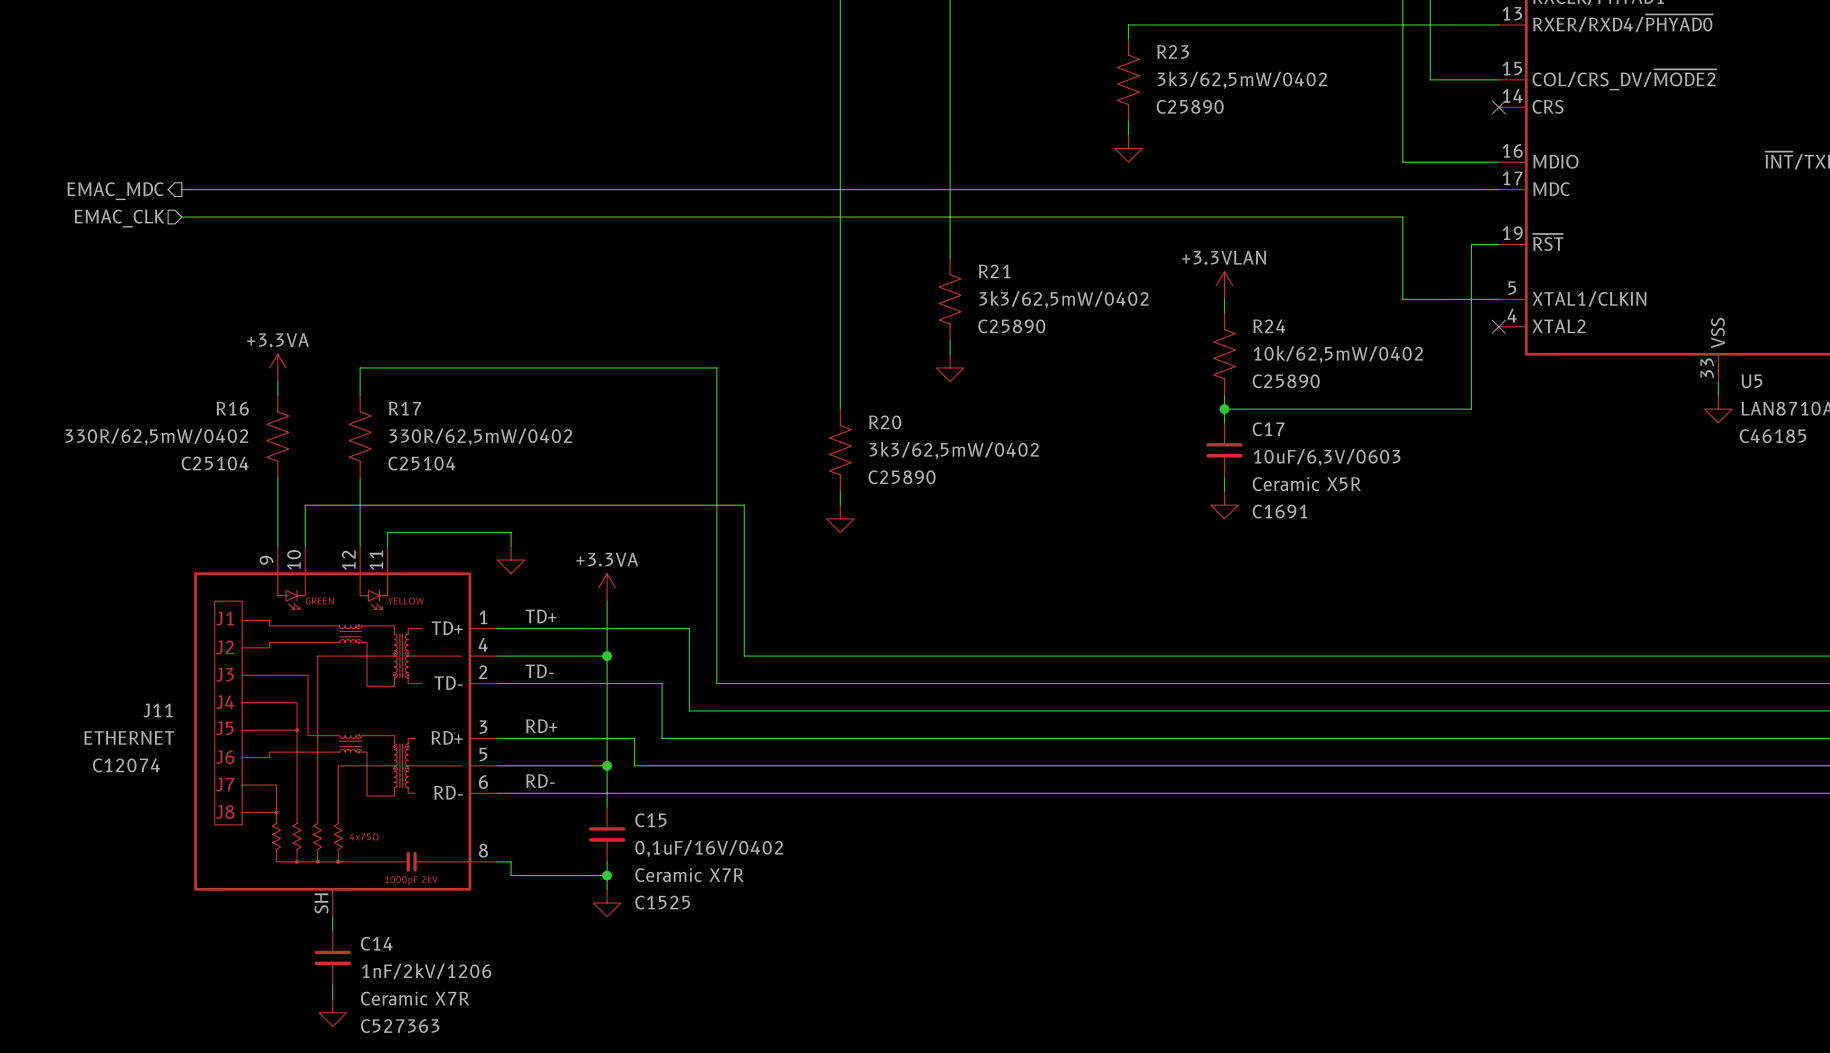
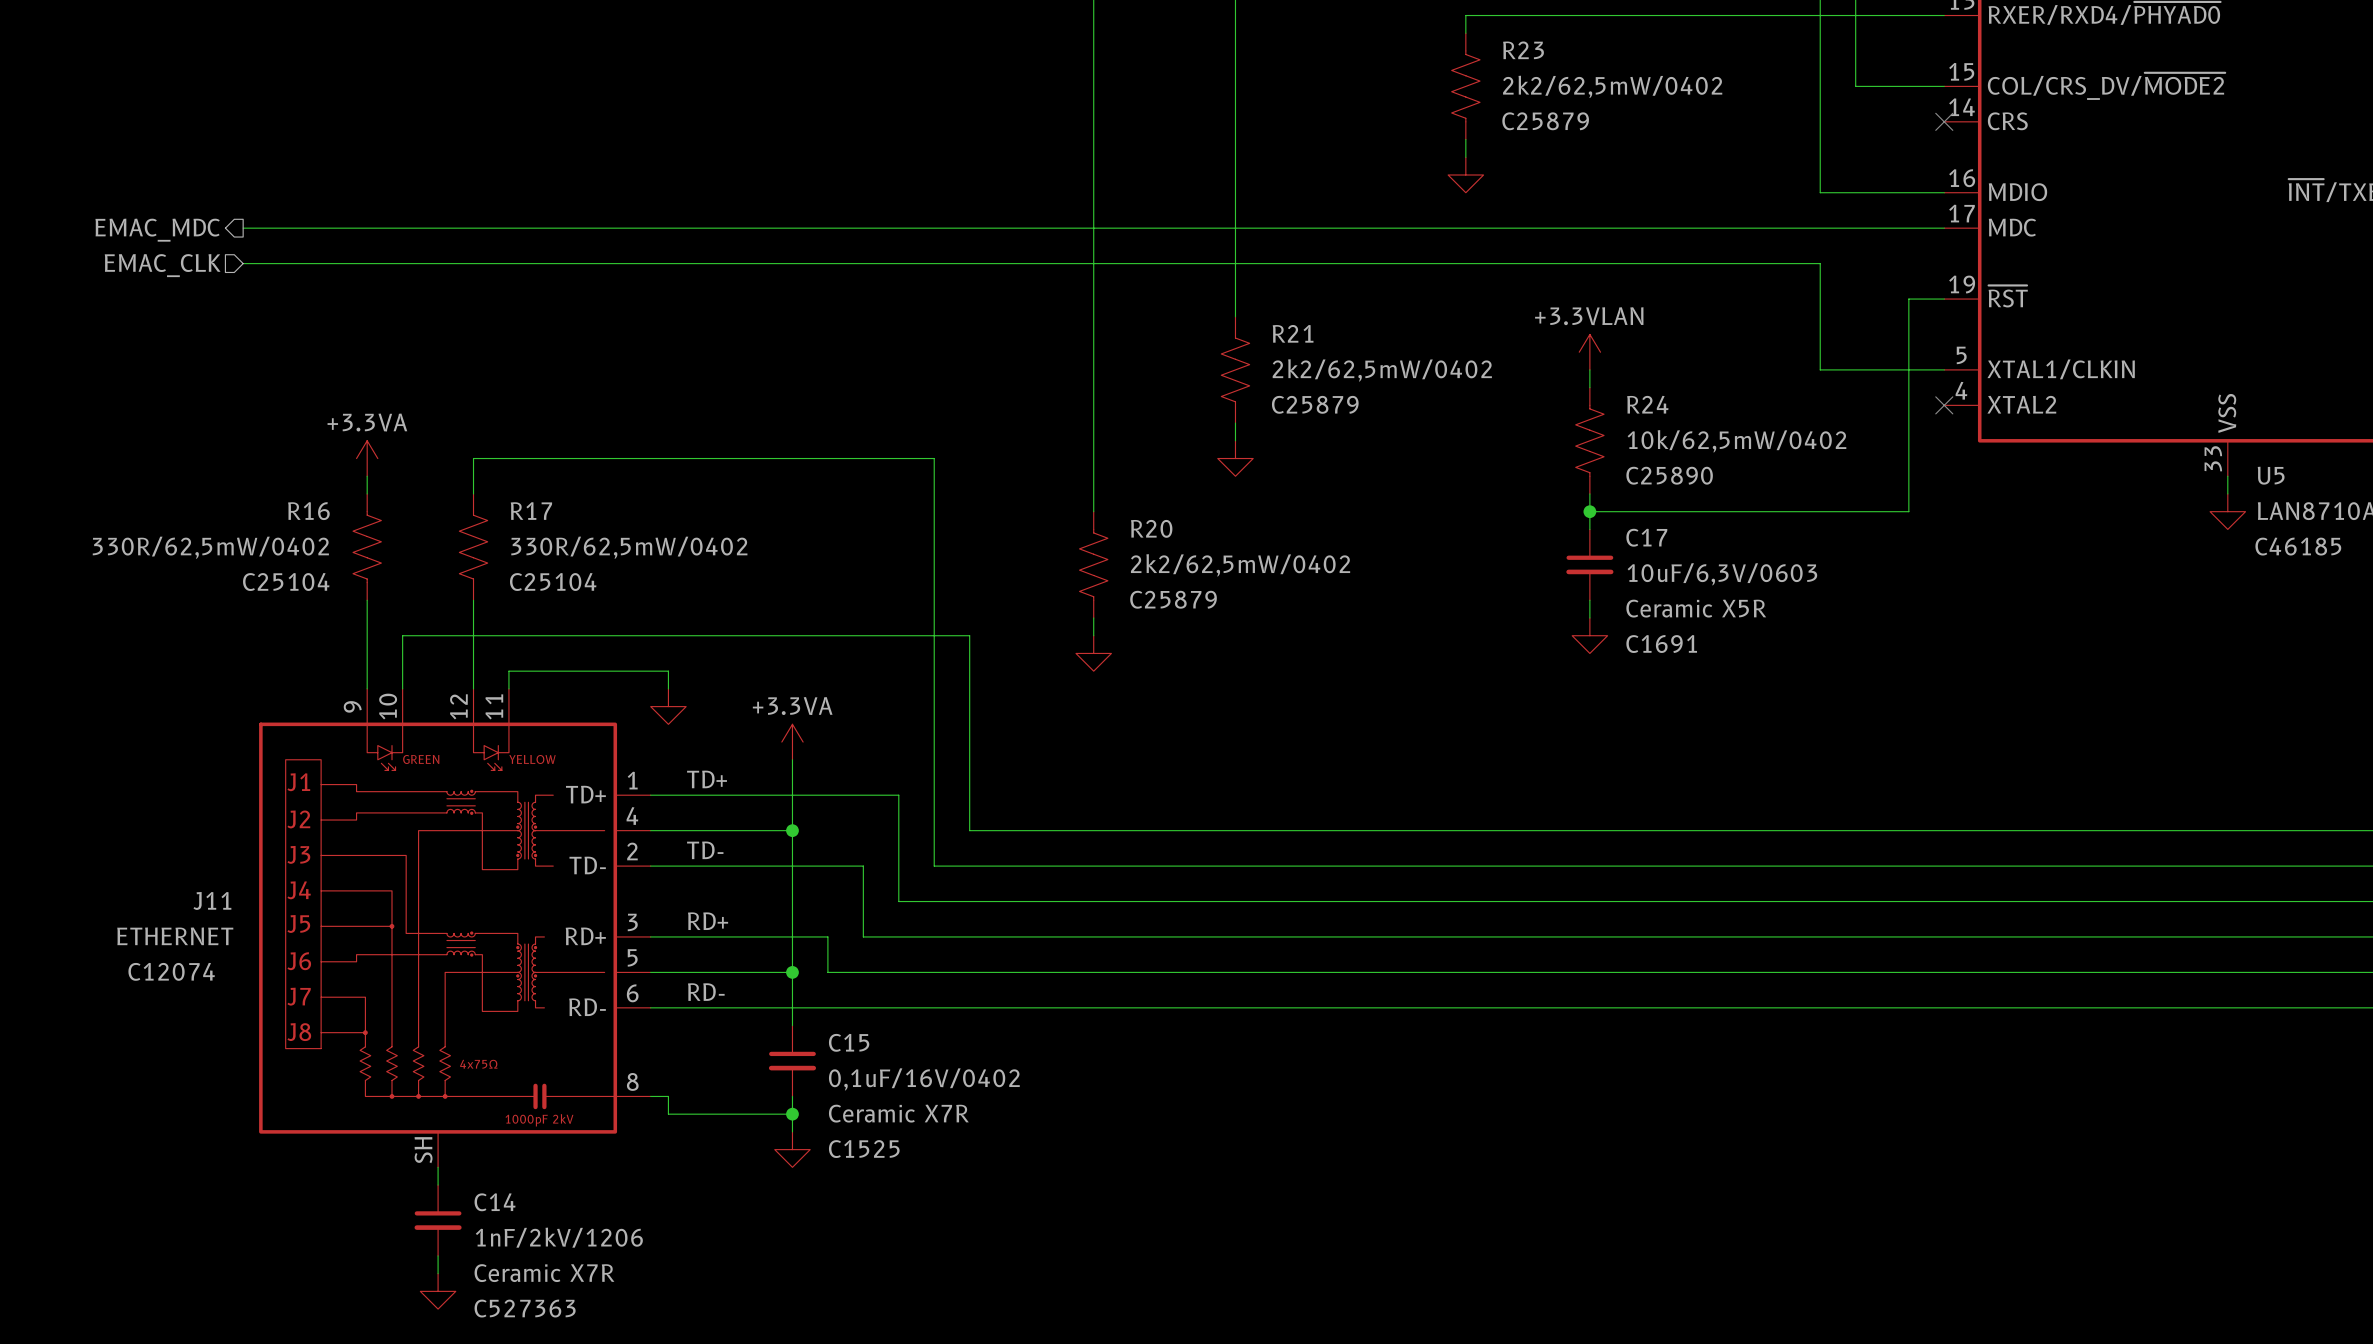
R23 value: 3k3/62,5mW/0402 (1242, 80) -> 2k2/62,5mW/0402 (1612, 86)
R23 text: C25890 (1190, 106) -> C25879 (1545, 121)
R21 value: 3k3/62,5mW/0402 (1063, 299) -> 2k2/62,5mW/0402 (1382, 370)
R21 text: C25890 (1011, 326) -> C25879 (1315, 404)
R20 value: 3k3/62,5mW/0402 (954, 450) -> 2k2/62,5mW/0402 (1240, 565)
R20 text: C25890 (902, 477) -> C25879 (1173, 599)

